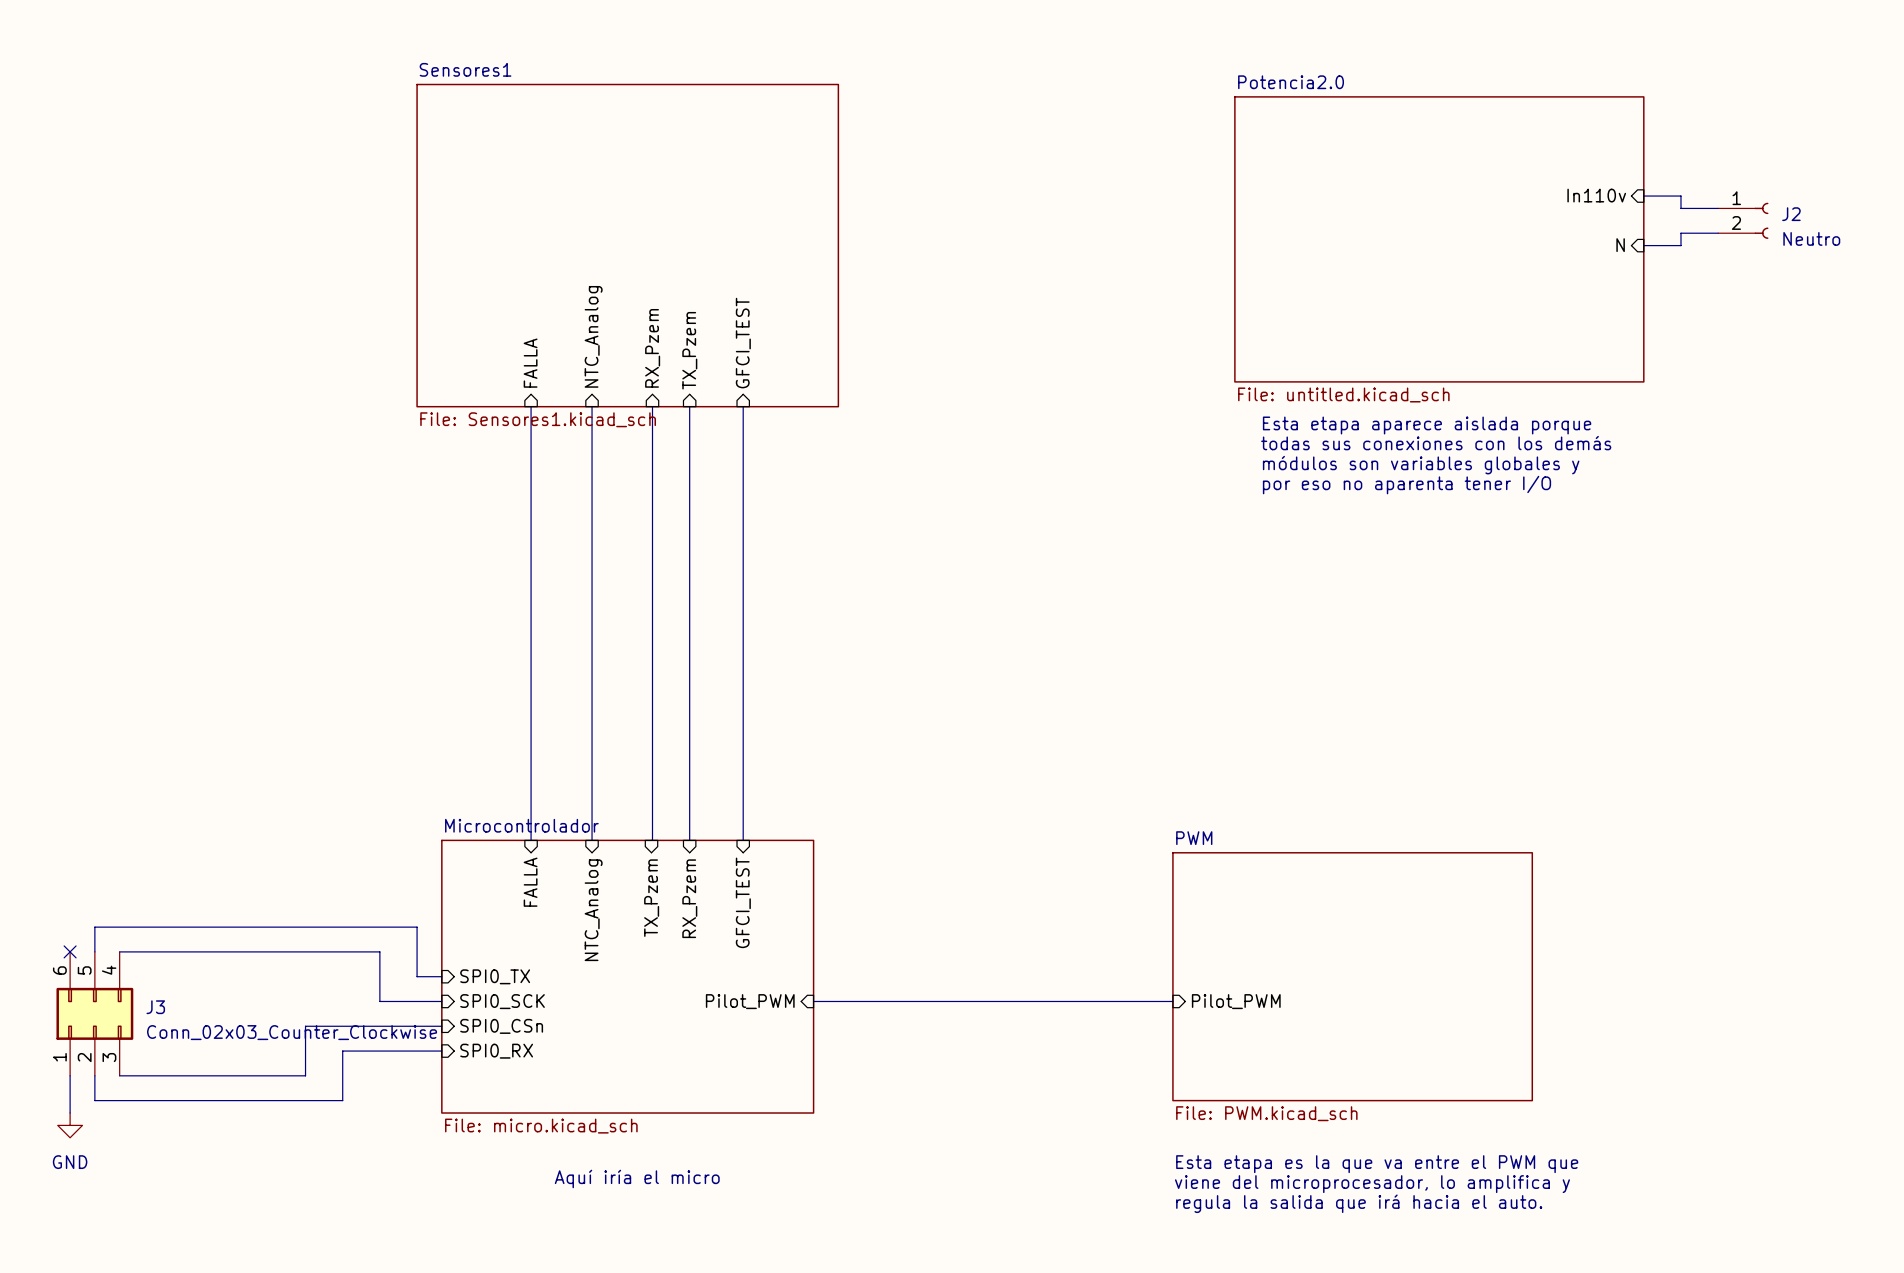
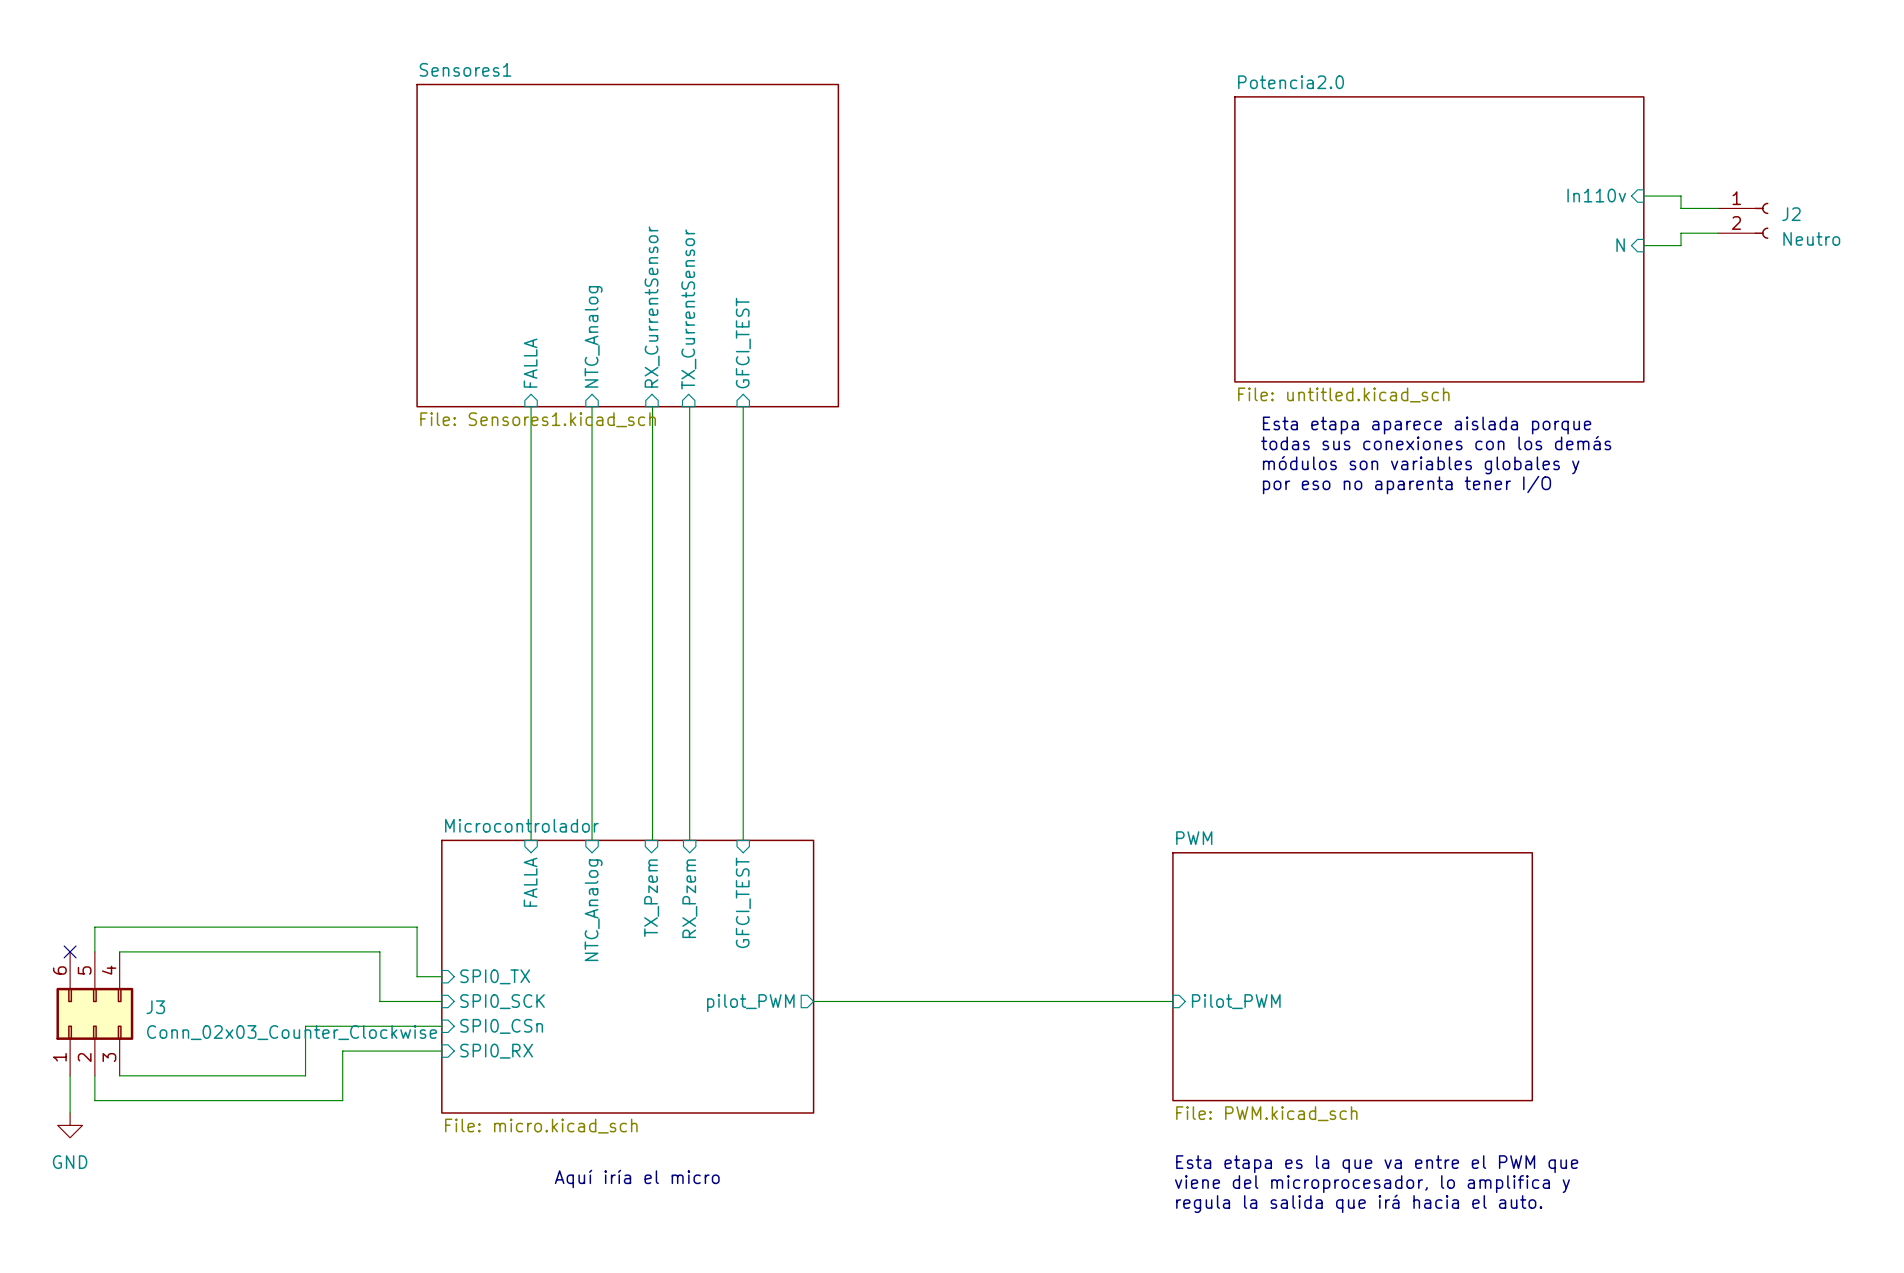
sheet pin: RX_Pzem (652, 348) -> RX_CurrentSensor (652, 307)
sheet pin: TX_Pzem (689, 350) -> TX_CurrentSensor (688, 309)
sheet pin shape: input (750, 1001) -> output (750, 1003)
sheet pin: Pilot_PWM (750, 1001) -> pilot_PWM (750, 1003)

